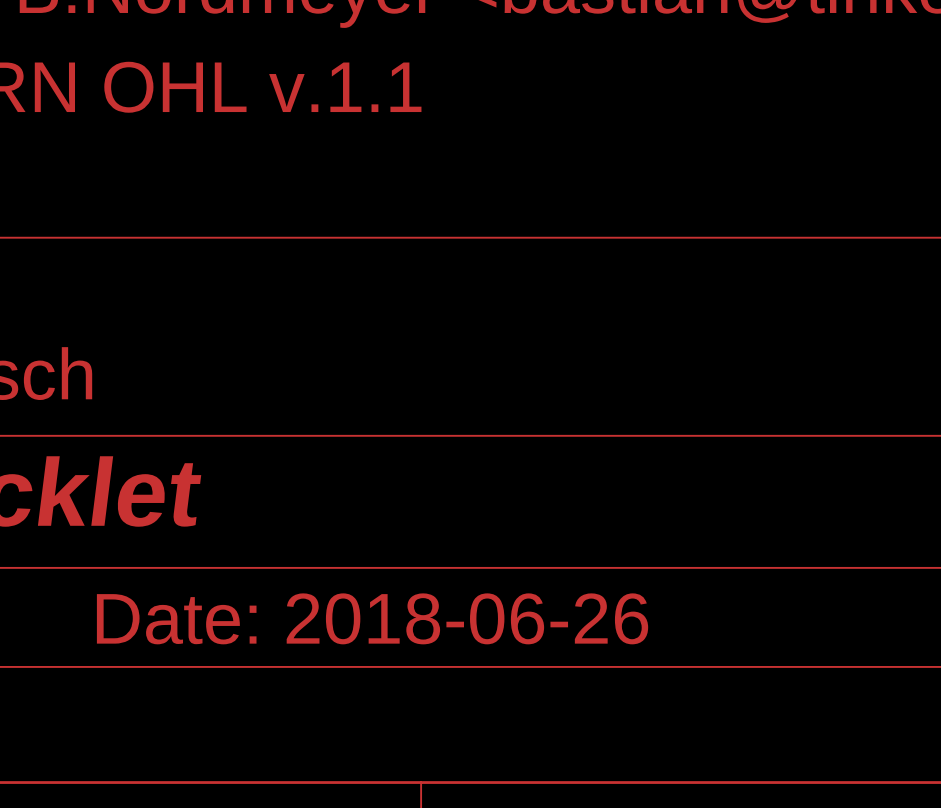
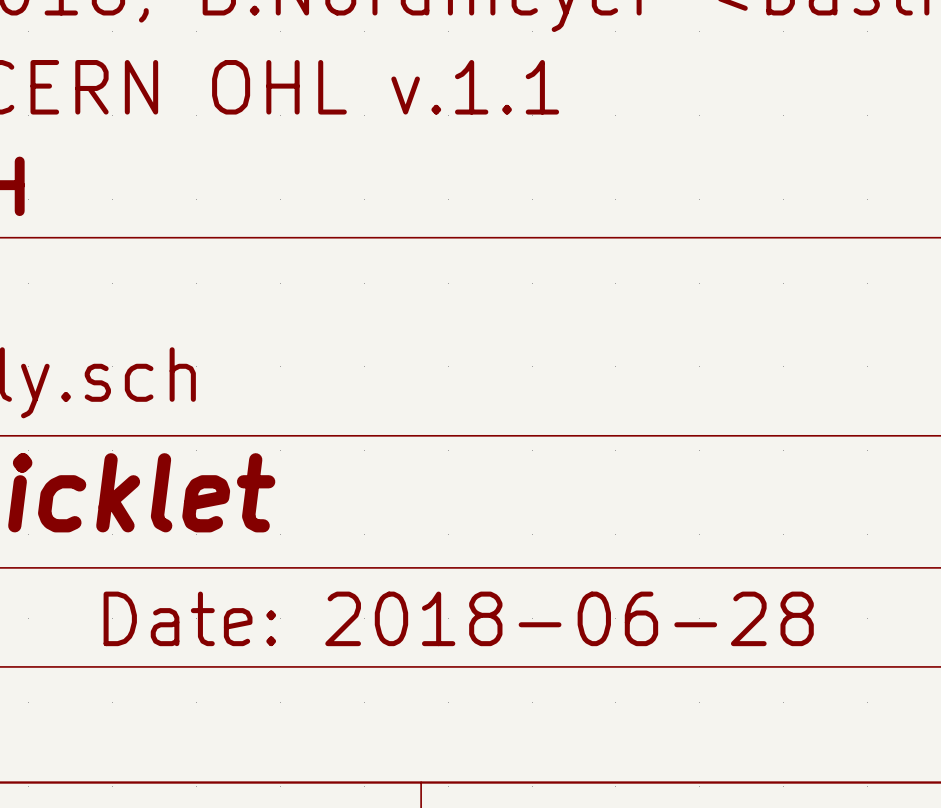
title block: Date: 2018-06-26 (372, 618) -> Date: 2018-06-28 (458, 618)

